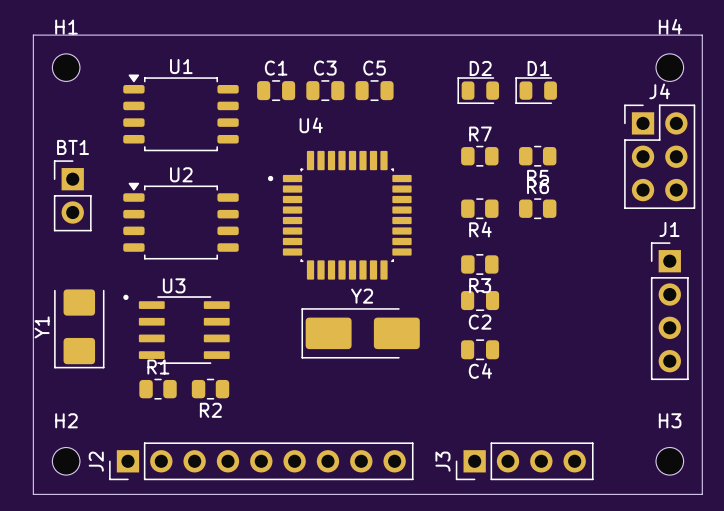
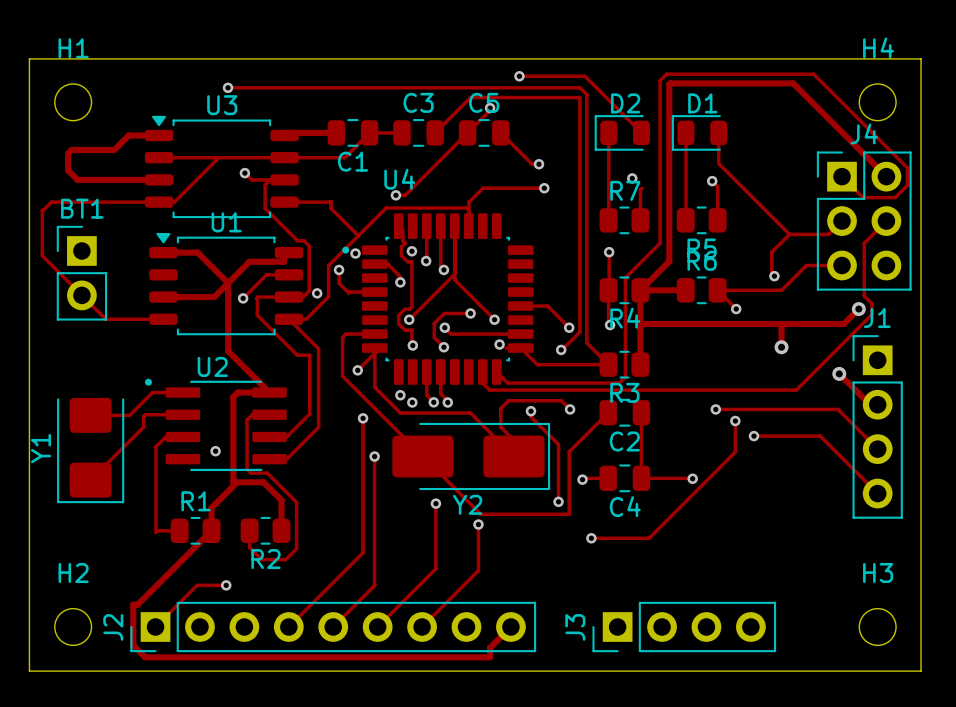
track: none -> (519, 76) (584, 76) (641, 132)
via: none -> (519, 76)
track: none -> (228, 87) (579, 87) (586, 94) (586, 342) (608, 364) (537, 364) (520, 348) (506, 348)
via: none -> (228, 87)
C1 name position: C1 (276, 68) -> C1 (353, 161)
track: none -> (490, 108) (490, 110) (405, 195) (395, 195)
via: none -> (490, 108)
track: none -> (401, 132) (369, 132) (344, 157) (159, 157)
track: none -> (435, 132) (470, 97) (579, 97) (579, 332) (561, 349)
track: none -> (500, 132) (532, 164) (538, 164)
track: none -> (608, 132) (608, 220)
track: none -> (685, 132) (685, 220)
track: none -> (718, 132) (718, 163) (789, 234)
track: none -> (159, 135) (128, 135) (114, 150) (71, 150) (68, 153) (68, 170) (77, 179) (159, 179)
track: none -> (284, 135) (287, 132) (336, 132) (333, 135)
track: none -> (218, 157) (174, 202) (51, 202) (42, 210) (42, 255) (105, 319) (163, 319)
U1 position: (180, 112) -> (226, 284)
via: none -> (538, 164)
track: none -> (244, 173) (251, 179) (284, 179)
via: none -> (244, 173)
track: none -> (842, 176) (863, 197) (895, 197) (907, 185) (907, 167) (813, 74) (666, 74) (660, 80) (660, 243) (625, 277) (625, 376) (619, 383) (507, 383) (496, 372)
track: none -> (886, 176) (793, 83) (670, 83) (669, 261) (640, 290)
via: none -> (632, 178)
track: none -> (270, 179) (265, 185) (265, 208) (297, 240) (304, 240) (309, 246) (309, 290) (303, 297) (257, 297) (257, 315) (297, 355) (309, 355) (309, 413) (286, 436) (269, 436)
track: none -> (712, 181) (717, 186) (717, 220)
via: none -> (712, 181)
track: none -> (544, 188) (483, 188) (468, 202) (468, 226)
via: none -> (544, 188)
track: none -> (642, 188) (640, 189) (640, 220)
via: none -> (395, 195)
track: none -> (284, 202) (331, 201) (331, 208) (358, 235)
track: none -> (468, 210) (466, 208) (386, 208) (328, 265) (328, 296) (306, 319) (288, 319) (318, 348) (318, 427) (286, 459) (269, 459)
track: none -> (842, 221) (828, 234) (789, 234)
track: none -> (886, 221) (864, 243) (864, 295) (871, 303) (871, 314) (796, 390) (489, 390) (482, 383) (482, 372)
track: none -> (398, 226) (402, 230) (402, 240) (404, 242) (401, 246) (401, 255) (407, 261) (411, 261) (411, 307) (404, 309) (398, 315) (398, 324) (404, 330) (411, 330) (412, 345)
track: none -> (426, 226) (426, 261)
track: none -> (440, 226) (440, 266) (443, 269)
track: none -> (454, 226) (454, 279) (494, 319)
track: none -> (789, 234) (771, 252) (771, 273) (774, 276)
via: none -> (411, 251)
track: none -> (163, 252) (197, 252) (228, 283) (228, 351) (269, 392) (237, 392) (233, 397) (233, 482) (263, 482) (281, 500) (281, 530)
track: none -> (288, 252) (283, 257) (283, 261) (273, 261)
track: none -> (609, 252) (608, 323) (610, 325)
via: none -> (609, 252)
via: none -> (355, 253)
U2 footprint: [123, 182, 239, 260] -> [144, 378, 287, 472]
via: none -> (426, 261)
track: none -> (273, 261) (249, 261) (214, 297) (163, 297)
track: none -> (374, 264) (387, 264) (400, 276) (400, 282)
track: none -> (842, 265) (806, 265) (781, 290) (717, 290) (736, 308)
track: none -> (339, 269) (339, 283) (348, 293) (374, 292)
via: none -> (339, 269)
via: none -> (443, 269)
track: none -> (454, 274) (409, 319)
track: none -> (288, 274) (266, 274) (243, 298)
via: none -> (774, 276)
via: none -> (400, 282)
track: none -> (640, 290) (685, 290)
track: none -> (640, 290) (640, 364)
via: none -> (317, 293)
via: none -> (243, 298)
track: none -> (520, 306) (547, 306) (569, 327)
via: none -> (736, 309)
track: none -> (858, 309) (843, 323) (640, 323)
via: none -> (858, 309)
track: none -> (470, 313) (444, 313) (434, 323) (434, 337) (443, 347)
via: none -> (470, 313)
via: none -> (409, 319)
via: none -> (494, 319)
track: none -> (783, 323) (781, 325) (781, 347)
via: none -> (610, 325)
track: none -> (444, 327) (451, 334) (520, 334)
via: none -> (444, 327)
via: none -> (569, 327)
track: none -> (374, 334) (346, 334) (342, 337) (342, 376) (480, 514) (569, 514) (569, 451) (608, 412)
via: none -> (499, 344)
via: none -> (412, 345)
via: none -> (443, 347)
via: none -> (781, 347)
track: none -> (374, 348) (374, 387) (400, 413) (470, 413) (513, 456) (513, 440) (500, 427) (500, 408) (508, 400) (561, 400) (570, 409)
via: none -> (561, 349)
track: none -> (374, 353) (357, 370)
via: none -> (357, 370)
track: none -> (426, 372) (426, 395) (433, 402)
track: none -> (440, 372) (440, 393) (447, 402)
track: none -> (839, 373) (870, 404) (877, 404)
via: none -> (839, 373)
track: none -> (182, 392) (152, 392) (129, 415) (90, 415)
via: none -> (400, 395)
via: none -> (412, 402)
via: none -> (433, 402)
via: none -> (447, 402)
U3 footprint: [123, 294, 230, 364] -> [144, 115, 299, 219]
via: none -> (570, 409)
track: none -> (715, 409) (838, 409) (877, 449)
via: none -> (715, 409)
track: none -> (530, 411) (530, 416) (558, 444) (558, 501)
via: none -> (530, 411)
track: none -> (641, 412) (641, 478) (692, 478)
track: none -> (182, 414) (145, 414) (143, 416) (143, 427) (90, 480)
track: none -> (269, 414) (252, 414) (247, 420) (247, 469) (250, 473) (267, 473) (296, 502) (296, 548) (285, 559) (261, 559) (249, 547) (249, 530)
track: none -> (363, 418) (363, 552) (288, 627)
via: none -> (363, 418)
track: none -> (735, 420) (735, 452) (649, 538) (591, 538)
via: none -> (735, 420)
track: none -> (182, 436) (165, 436) (156, 446) (156, 532) (179, 530)
track: none -> (753, 436) (820, 436) (877, 493)
via: none -> (753, 436)
via: none -> (215, 451)
track: none -> (374, 456) (374, 585) (333, 627)
via: none -> (374, 456)
Y2 rotation: 0° (360, 333) -> 180° (471, 456)
track: none -> (608, 478) (582, 479)
via: none -> (582, 479)
via: none -> (692, 478)
track: none -> (237, 482) (211, 507) (211, 530) (137, 604) (133, 604) (133, 645) (145, 657) (490, 657) (490, 647) (510, 627)
via: none -> (558, 501)
track: none -> (435, 503) (435, 568) (377, 627)
via: none -> (435, 503)
track: none -> (478, 524) (478, 570) (422, 627)
via: none -> (478, 524)
via: none -> (591, 538)
track: none -> (226, 585) (197, 585) (155, 627)
via: none -> (226, 585)

